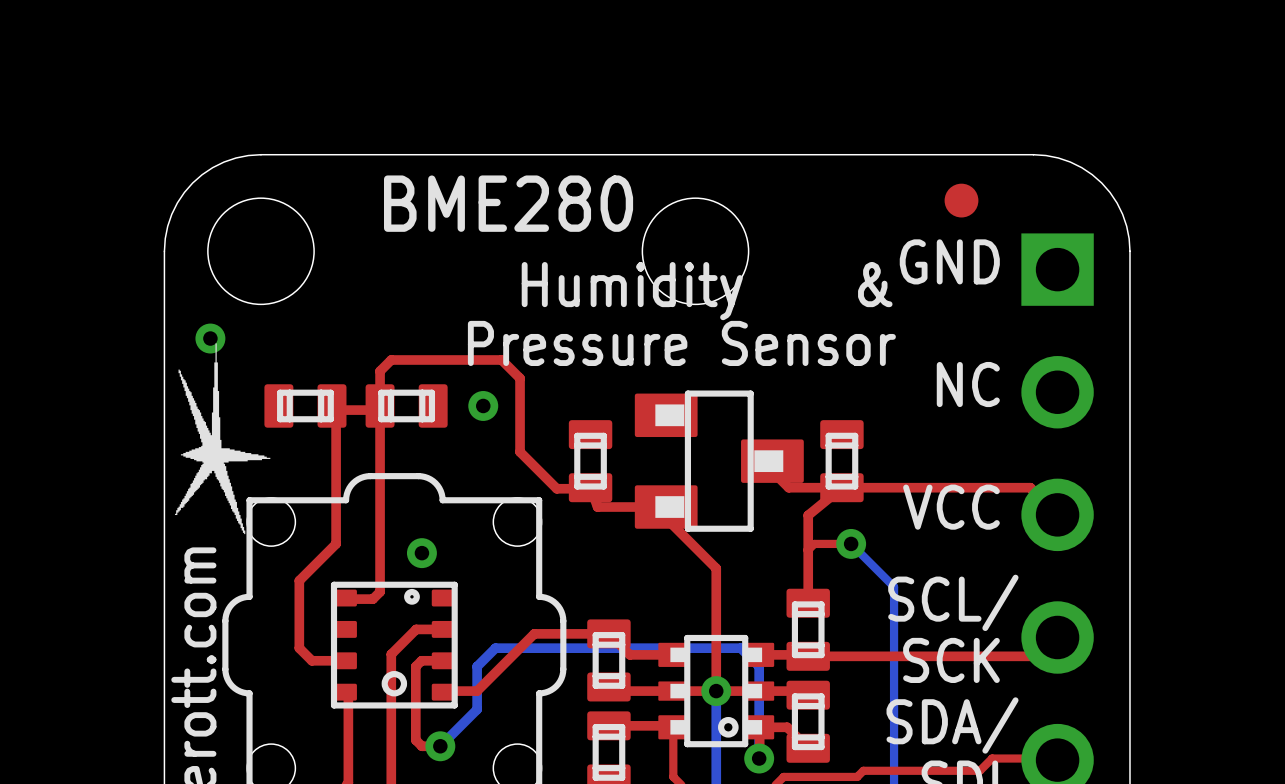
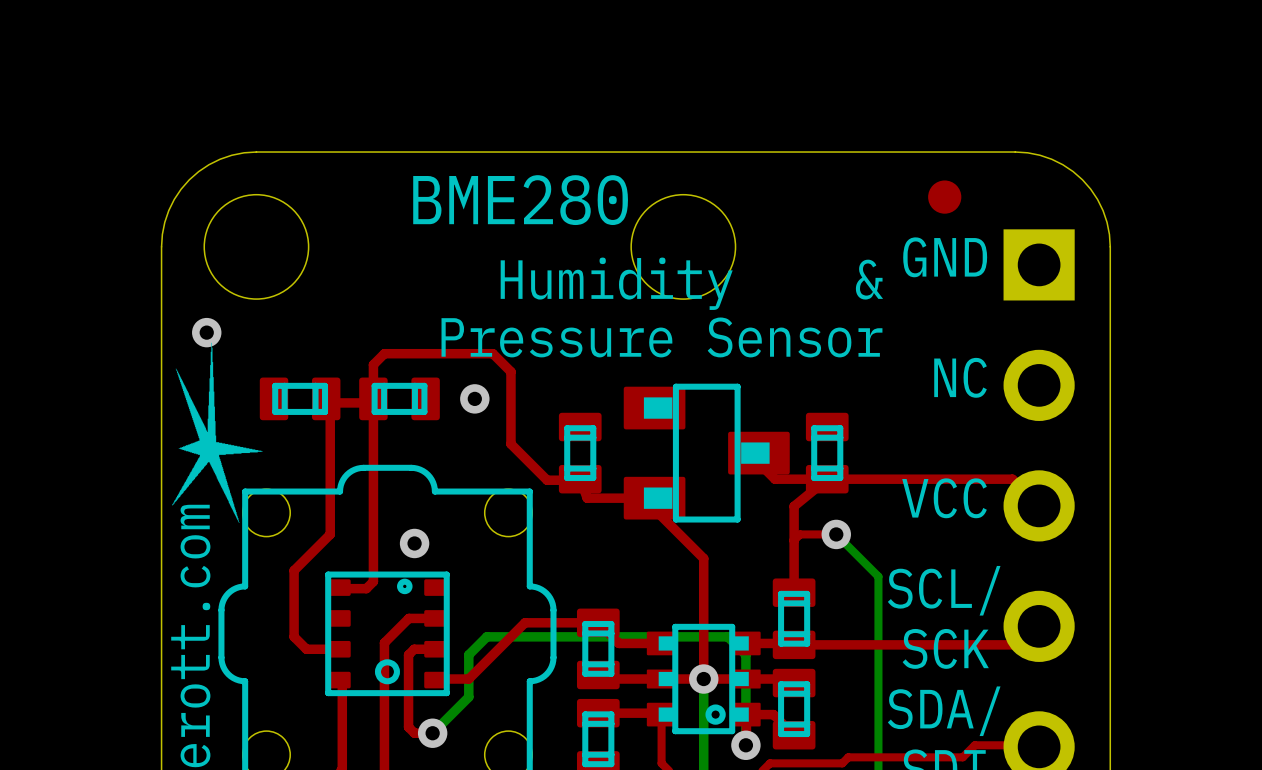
drawing shape: [174, 343, 271, 535] -> [172, 342, 263, 523]

